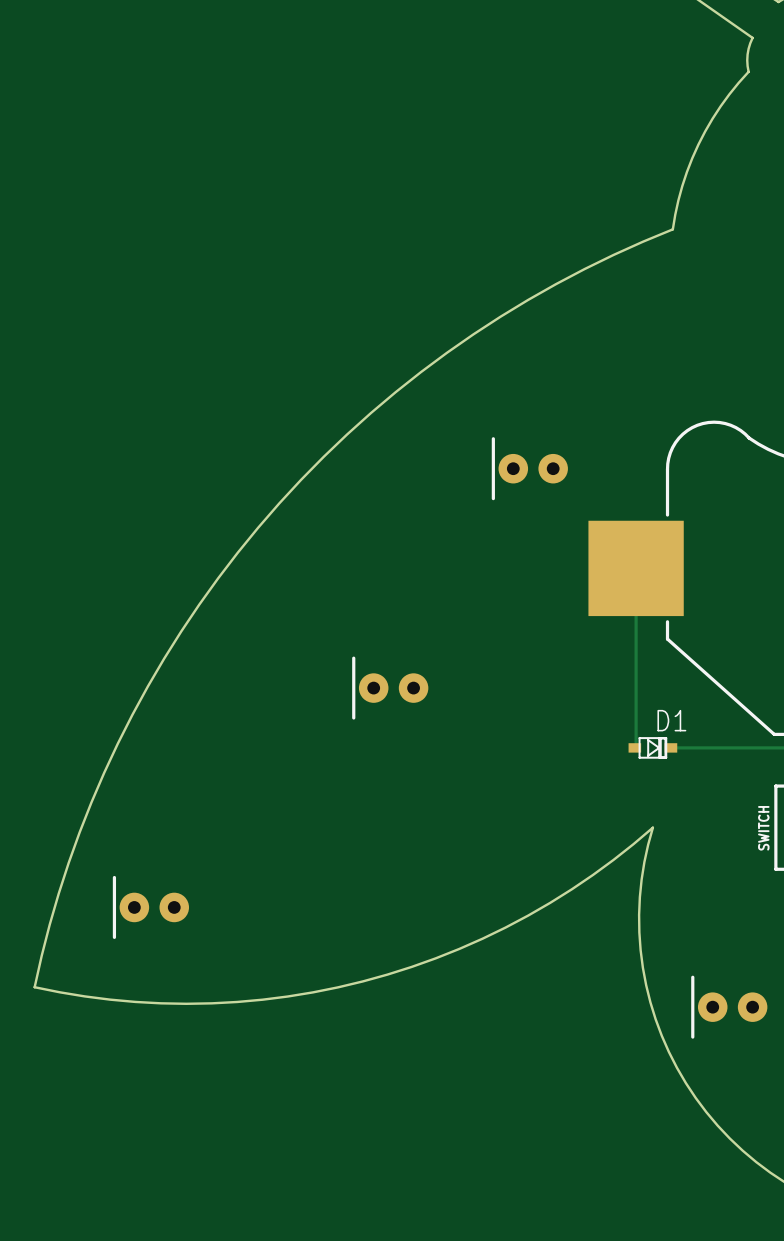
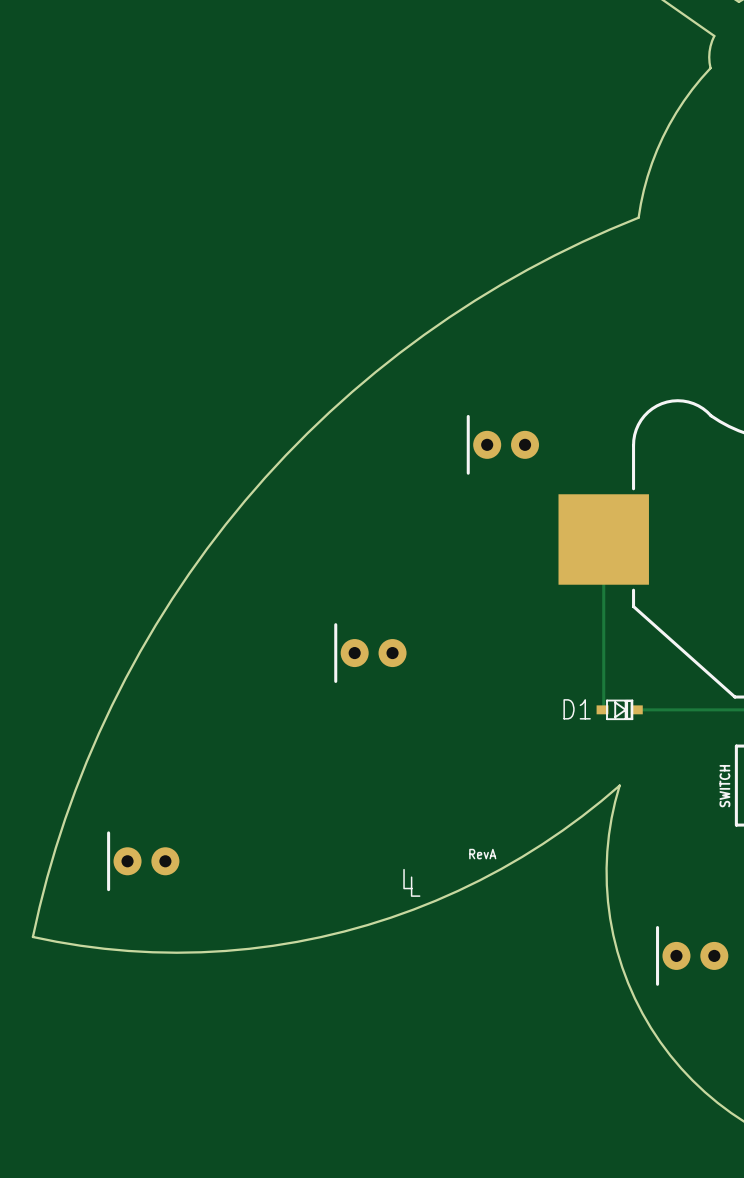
D1 name position: D1 (671, 720) -> D1 (577, 709)
drawing: none -> [469, 849, 496, 859]
drawing: none -> [403, 868, 421, 897]

